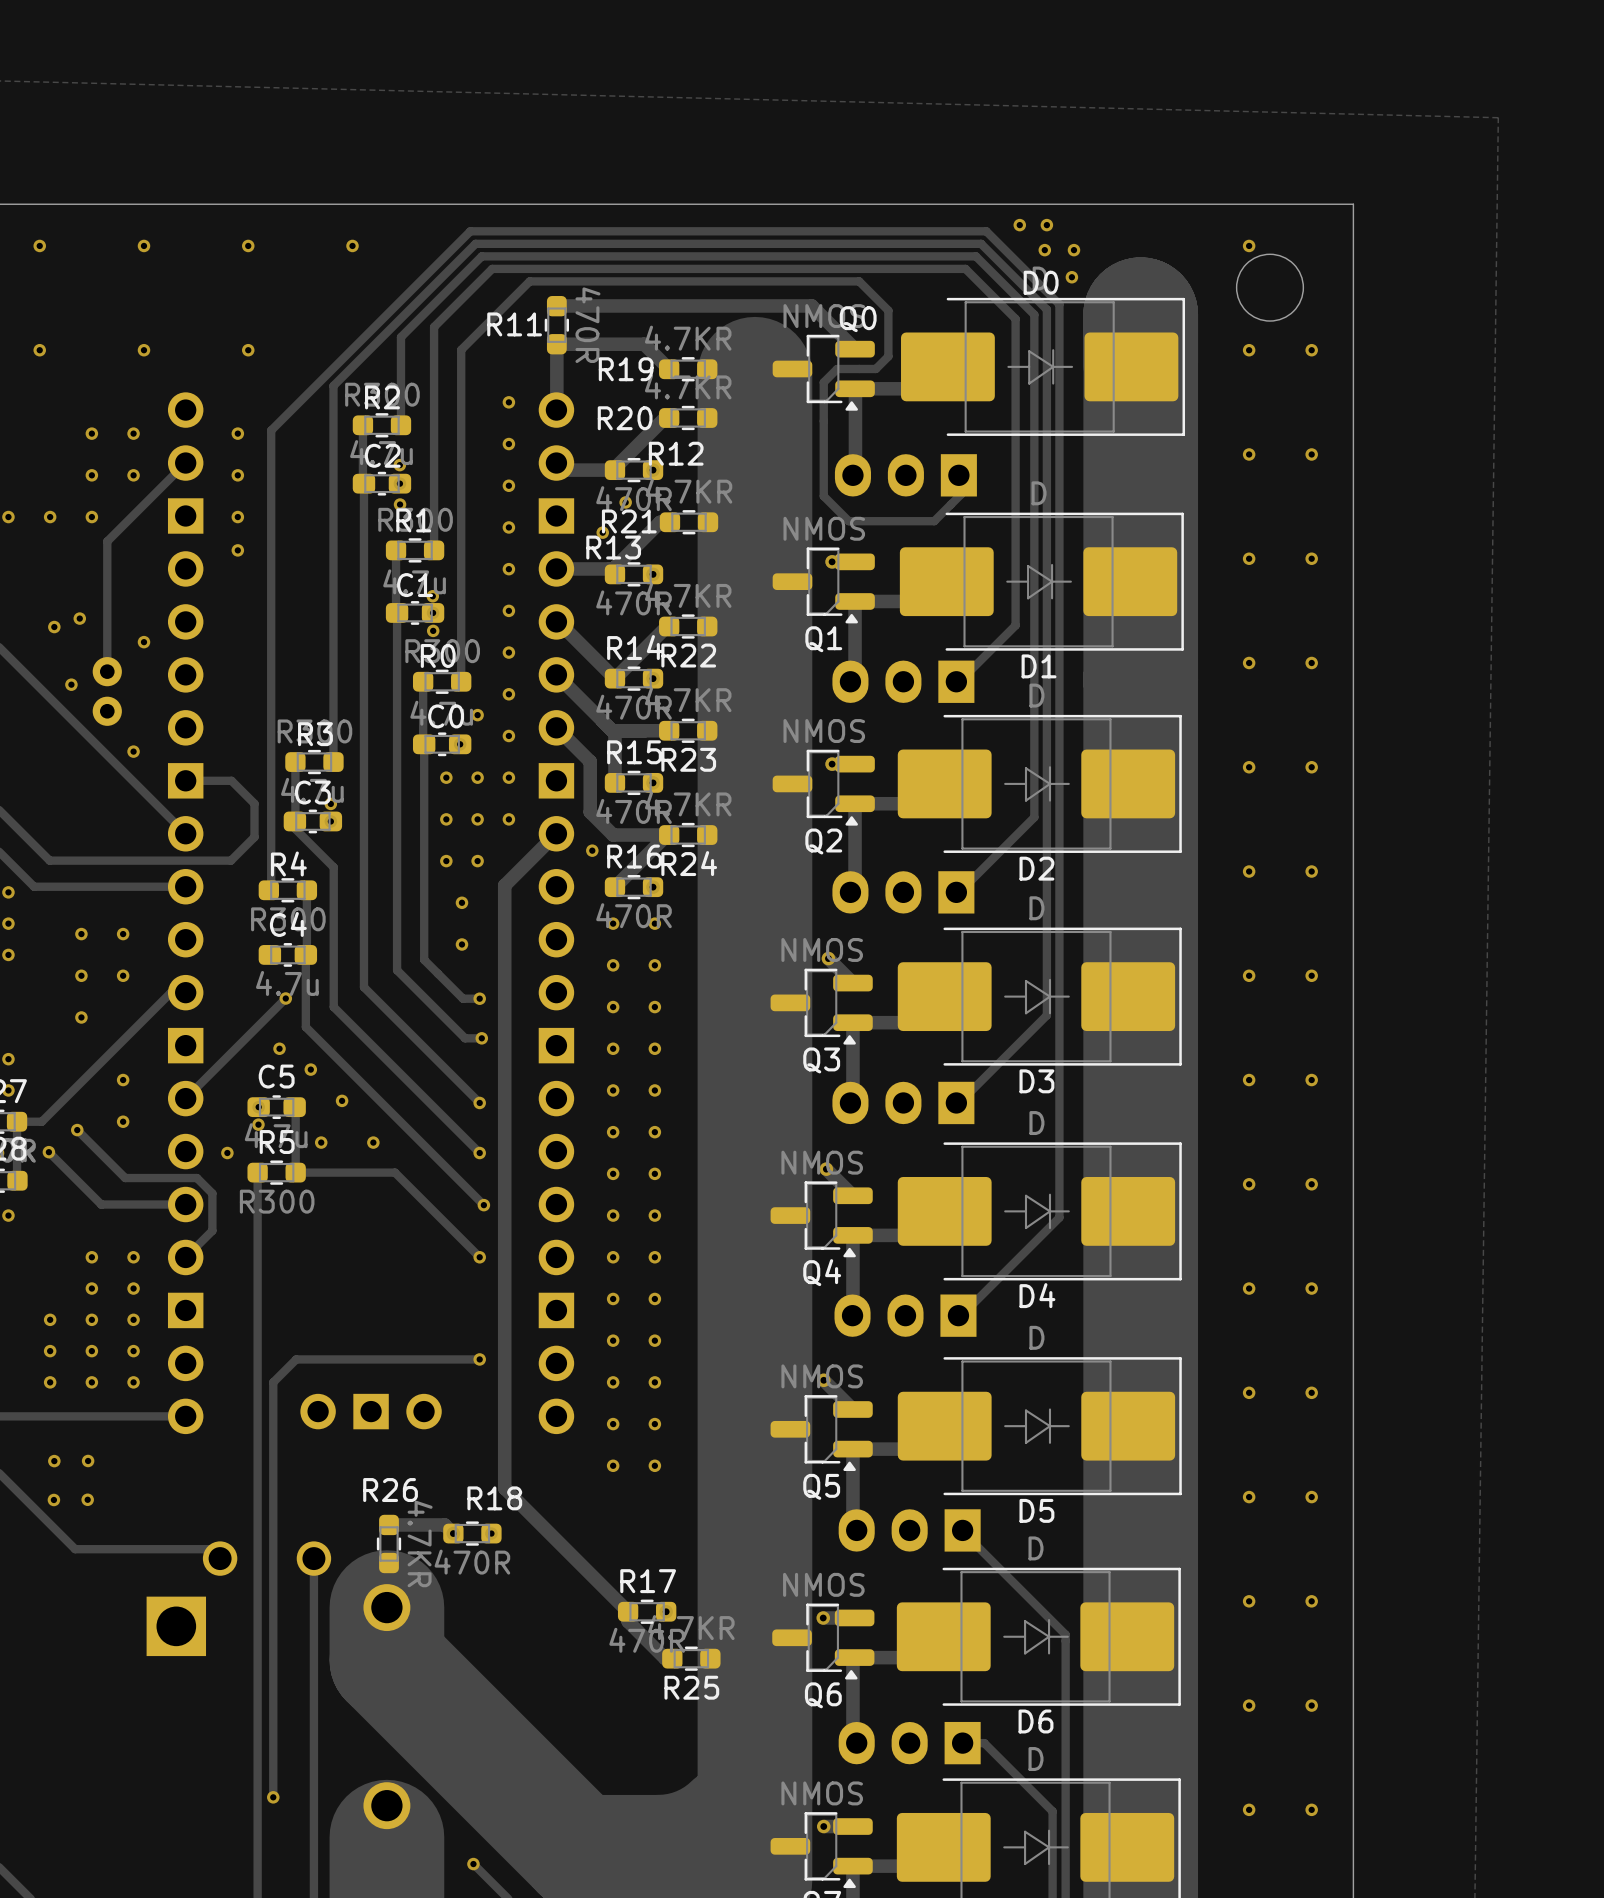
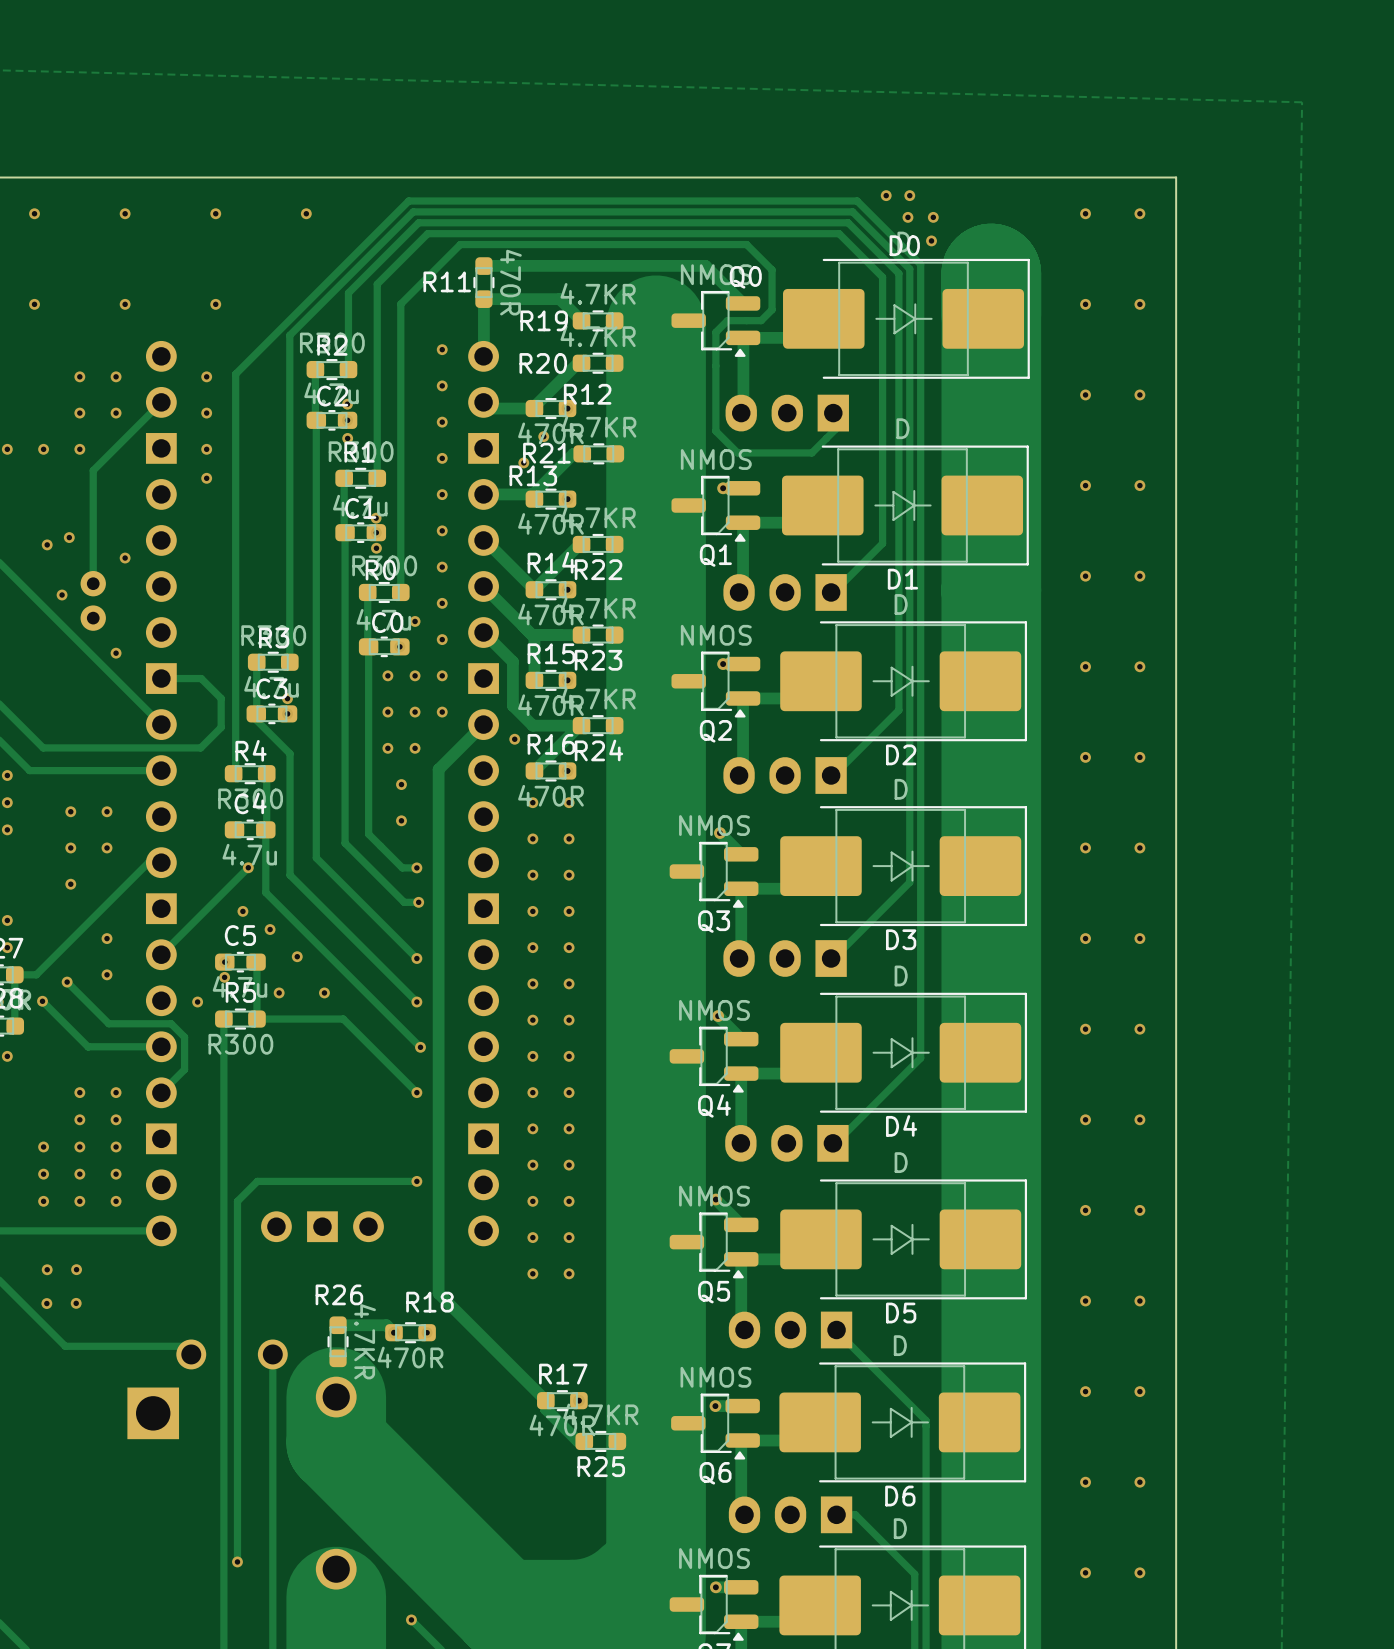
via: none -> (1139, 213)
round board edge: [1236, 253, 1304, 322] -> none

